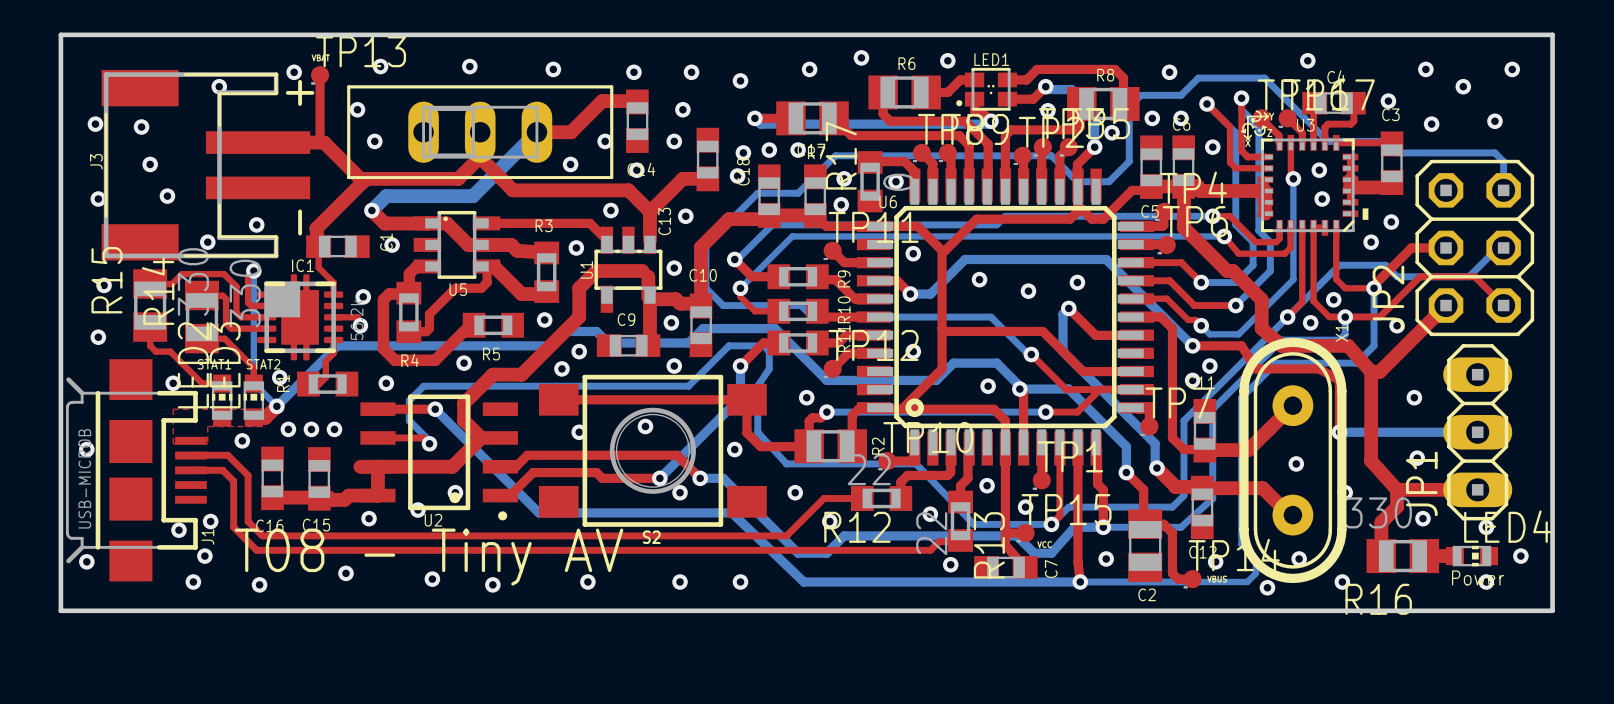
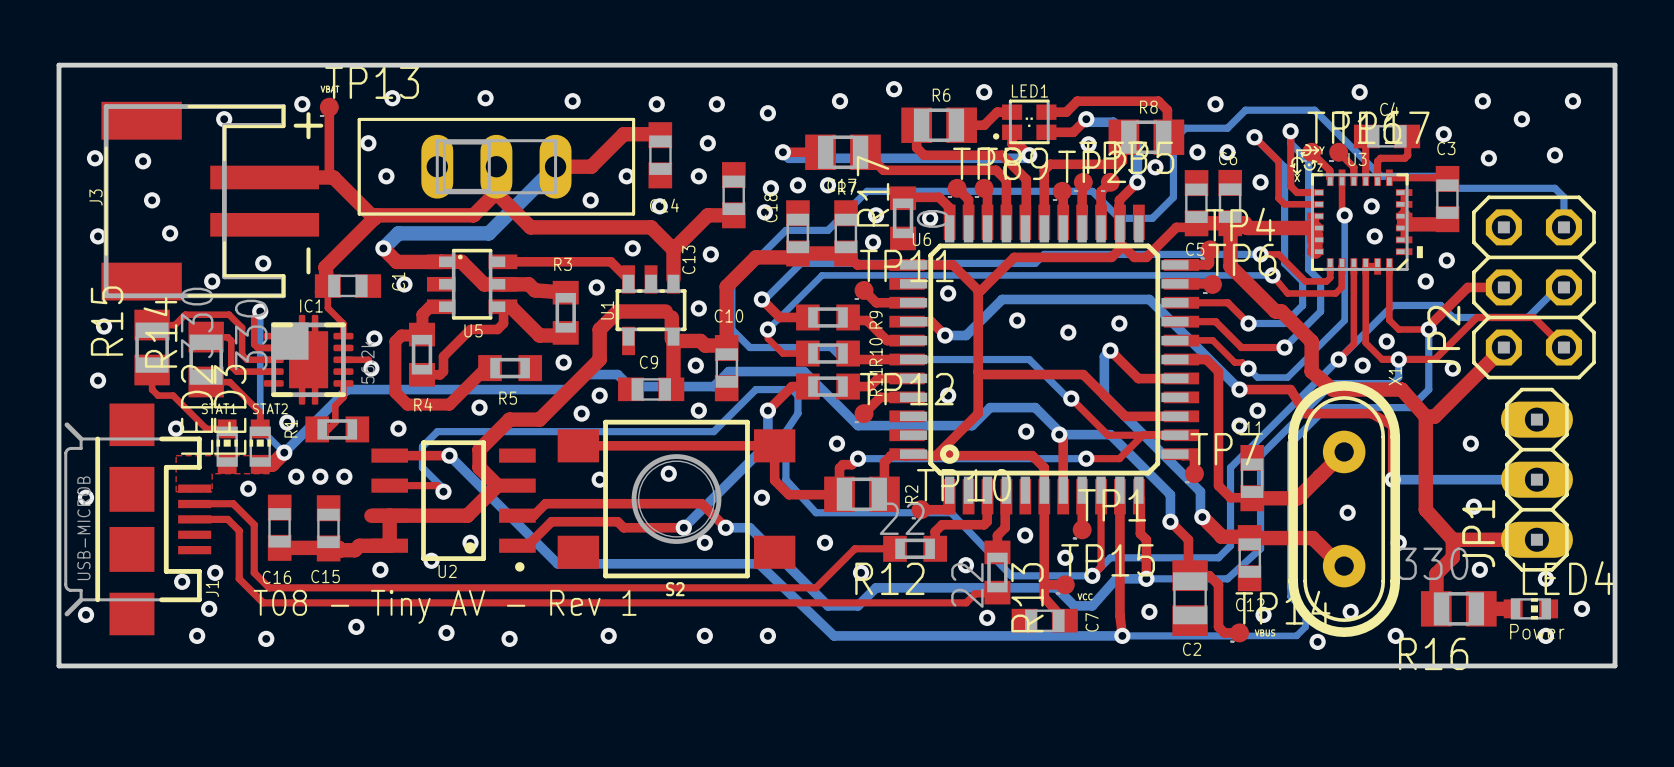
text: T08 - Tiny AV (429, 557) -> T08 - Tiny AV - Rev 1 (445, 606)

